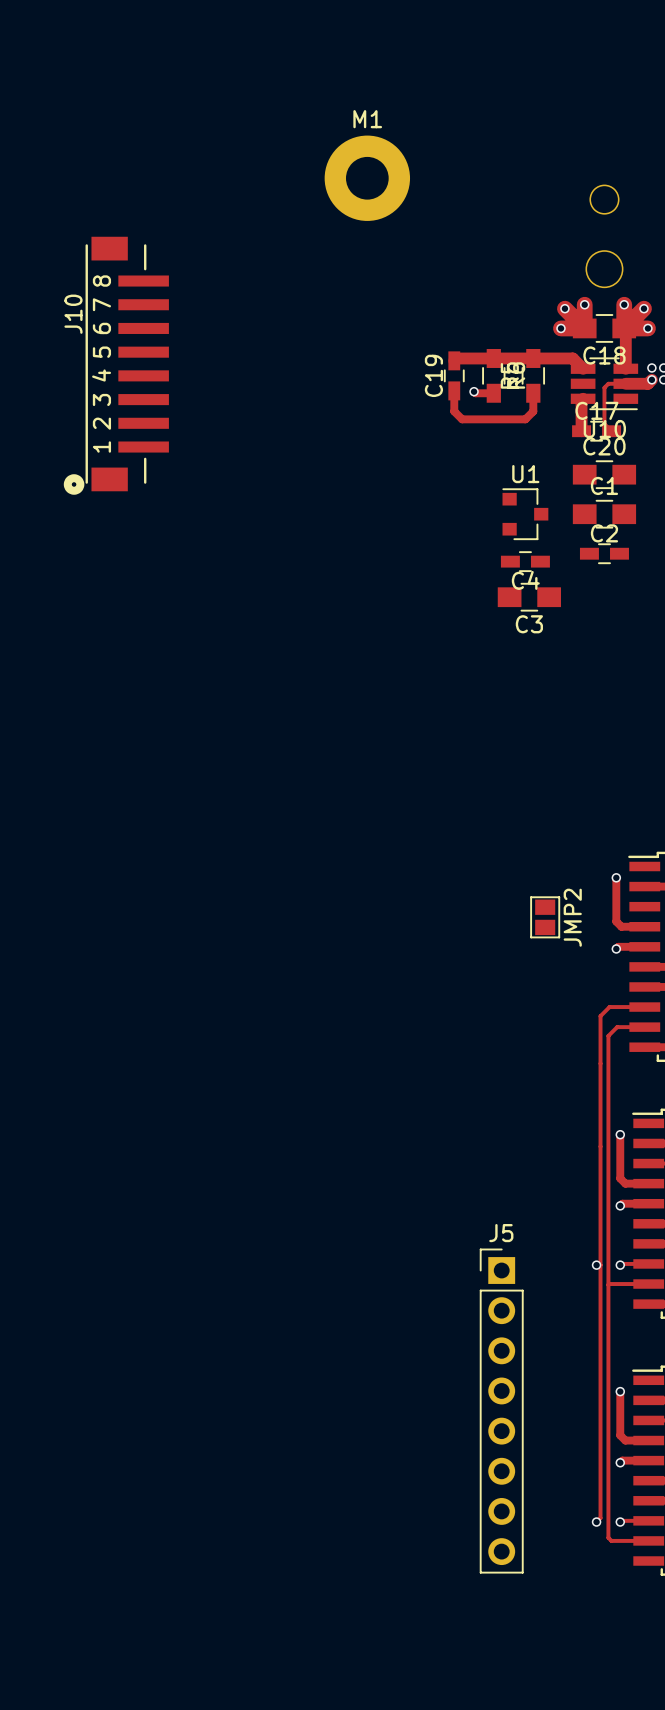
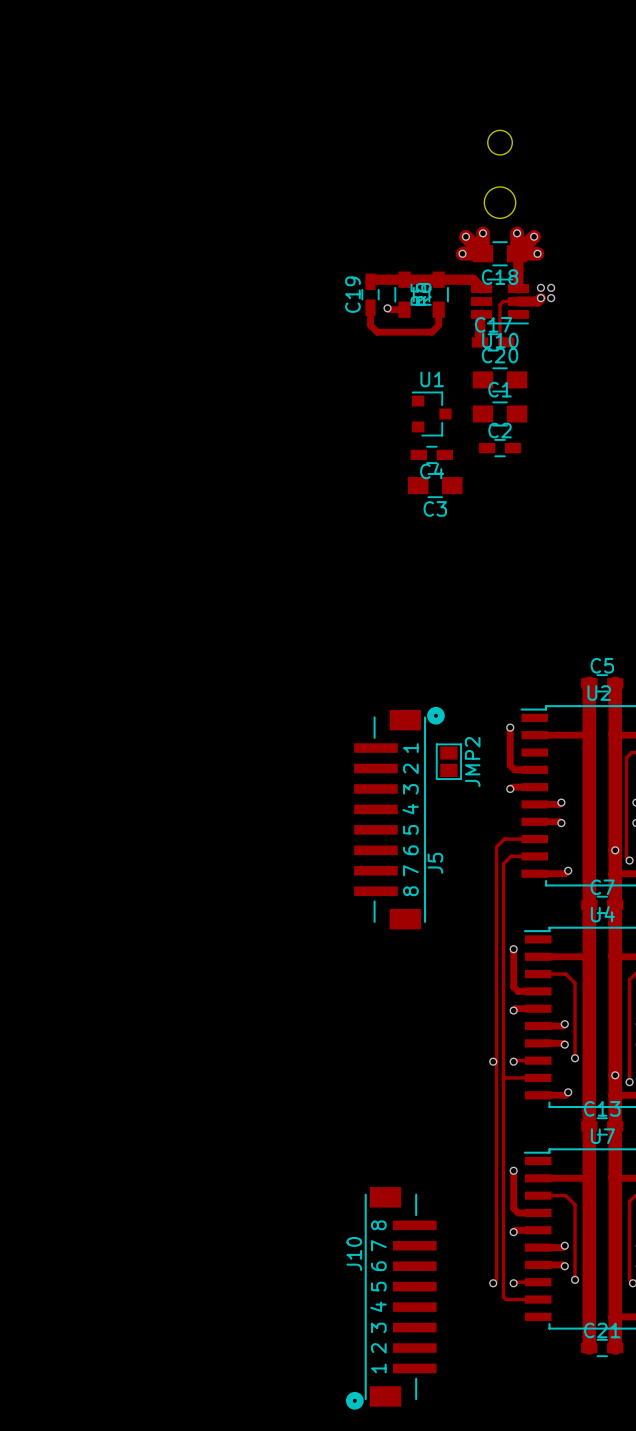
M1: (367, 178) -> none
J10 position: (116, 365) -> (391, 1298)
J5 name position: J5 (501, 1233) -> J5 (435, 863)
J5 footprint: [479, 1248, 524, 1574] -> [354, 706, 445, 930]

